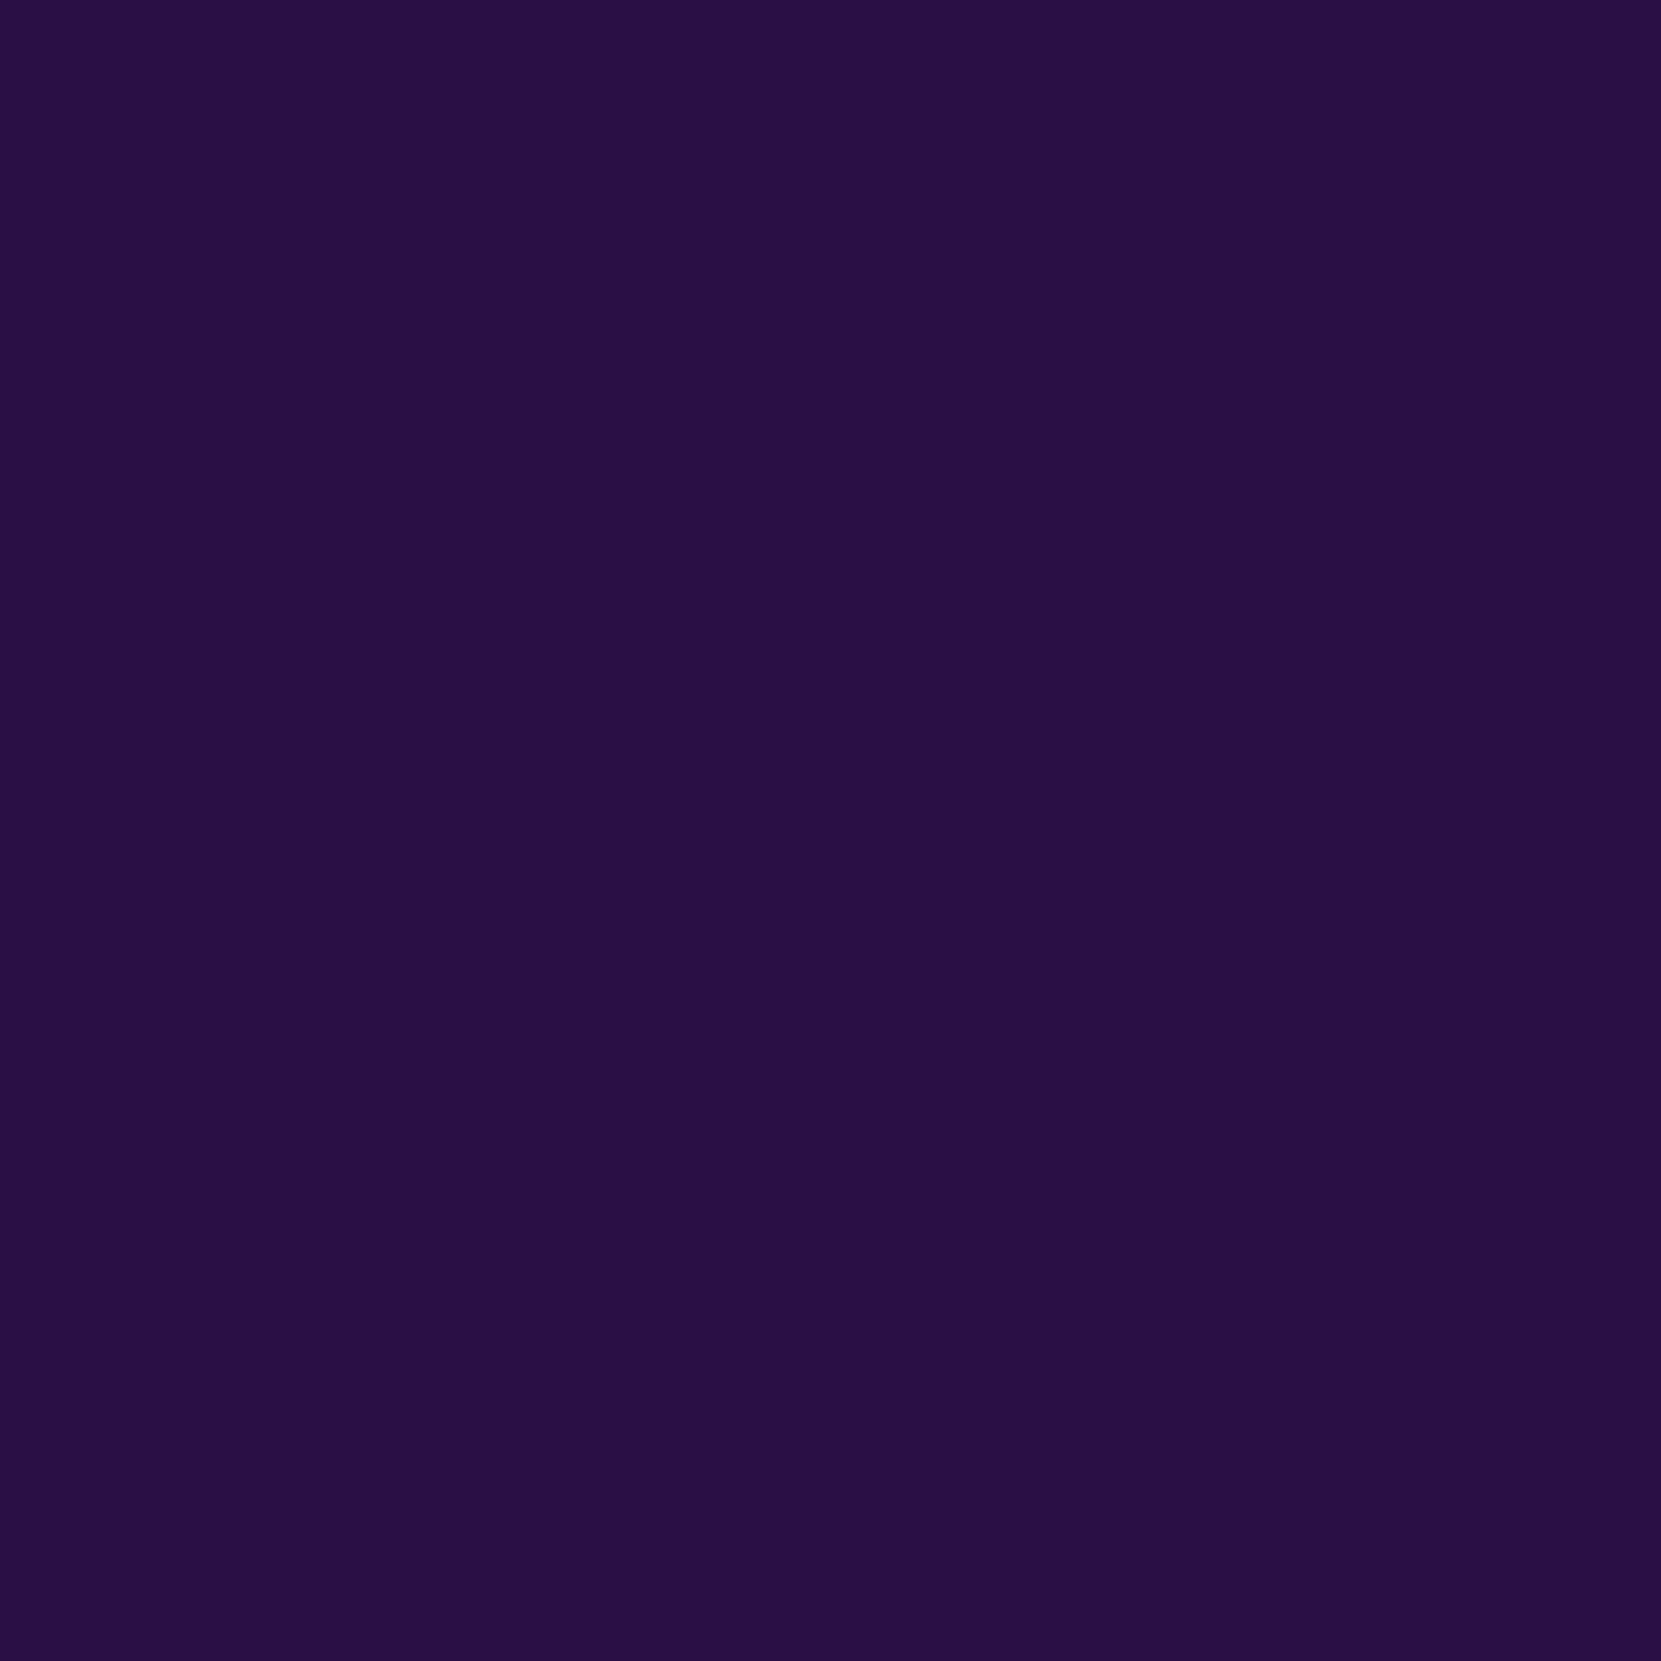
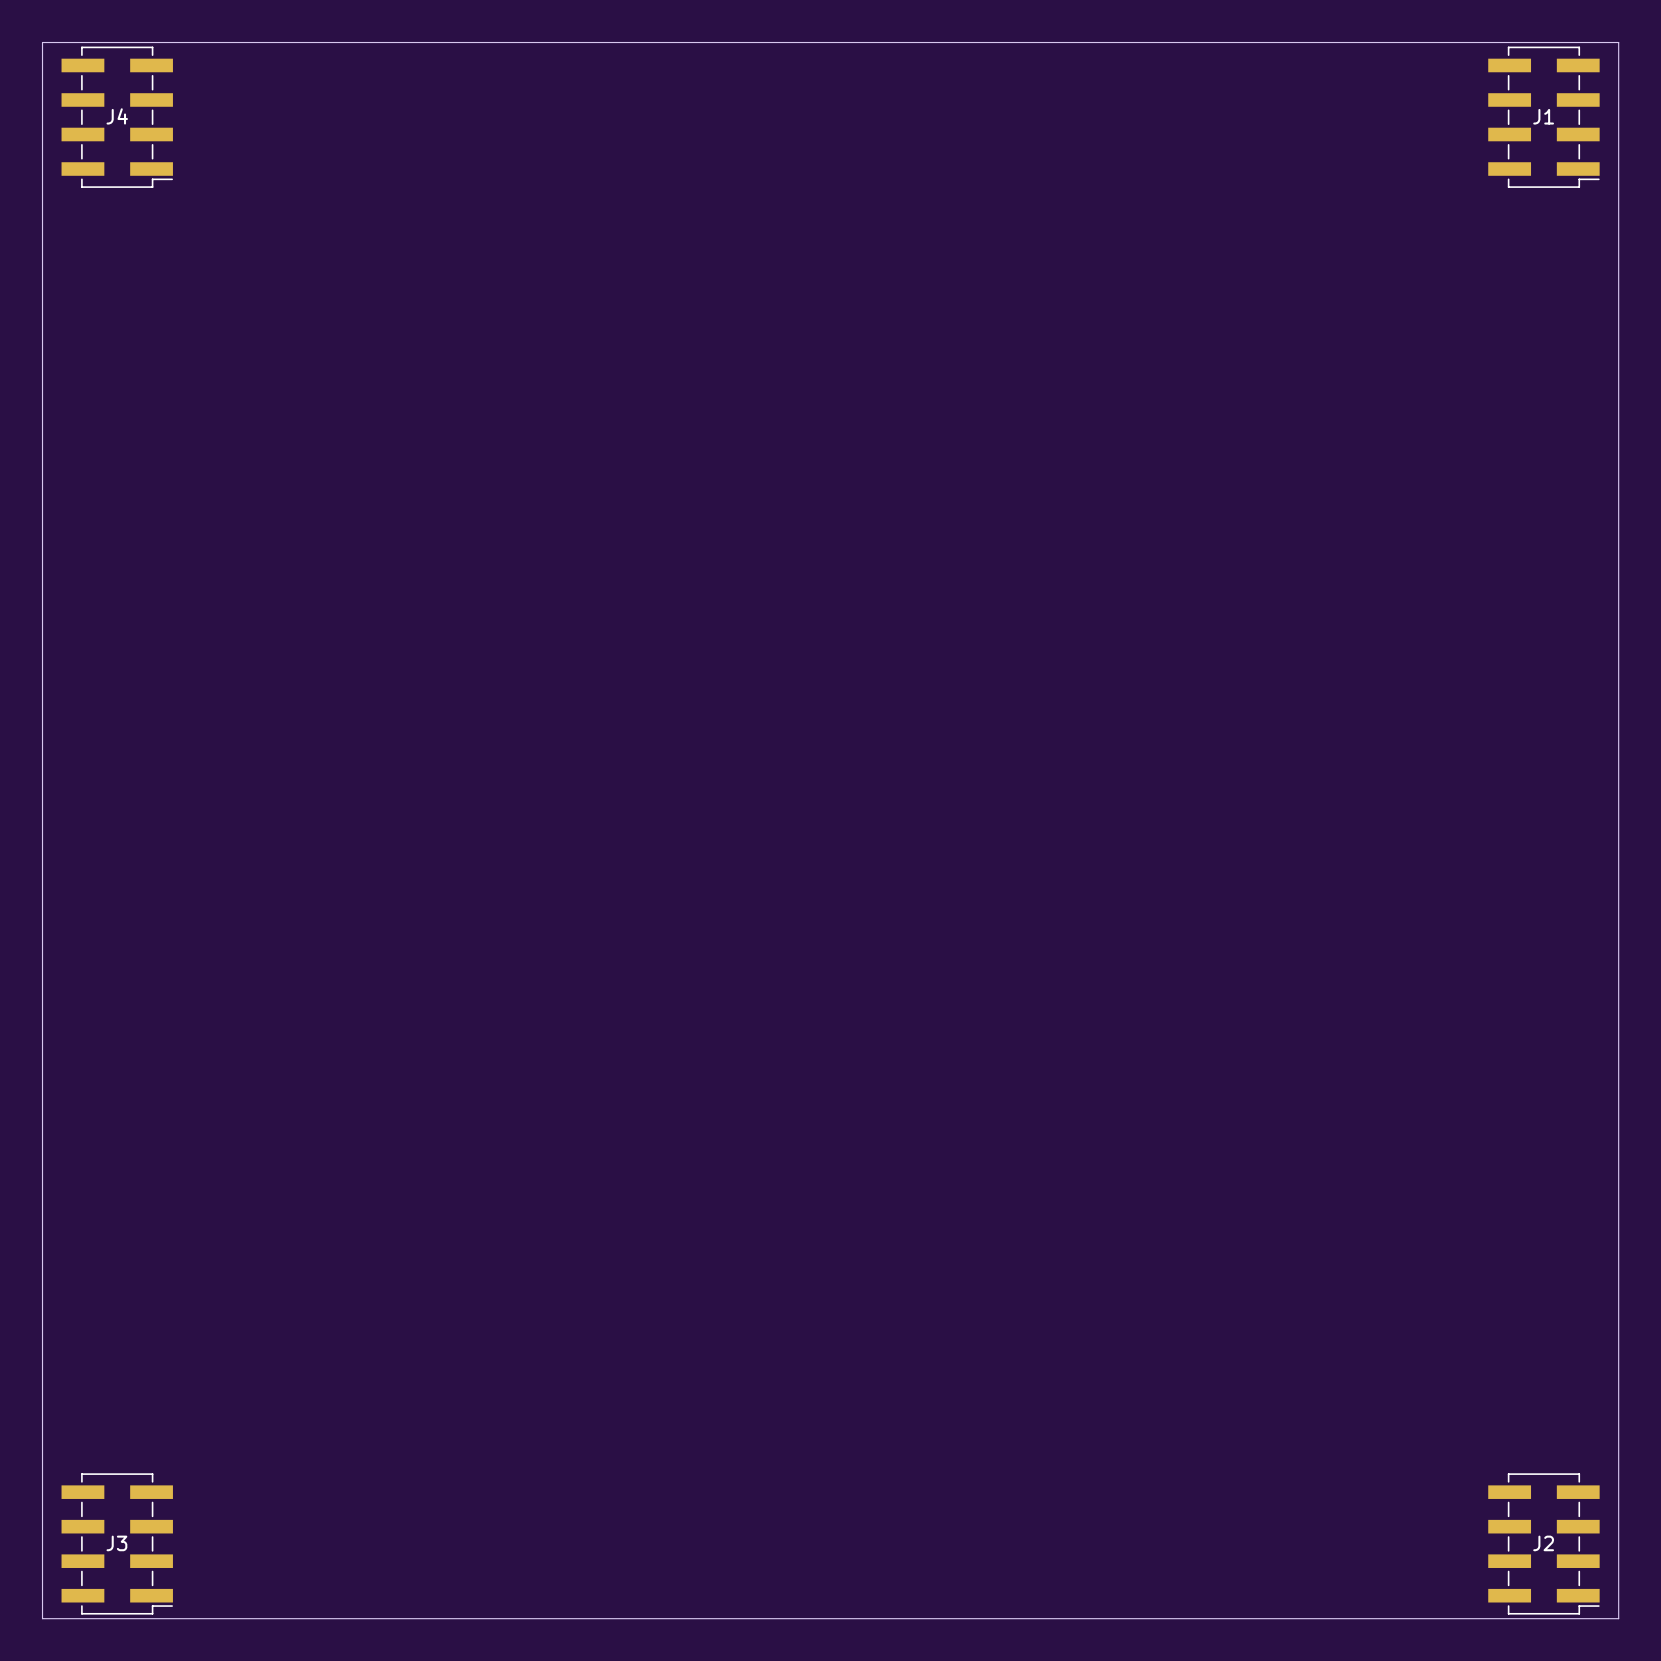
board edge: none -> (1618, 42) (1618, 1618) (42, 1618) (42, 42) (1618, 42)
J4: none -> (117, 117)
J1: none -> (1543, 117)
J3: none -> (117, 1543)
J2: none -> (1543, 1543)

